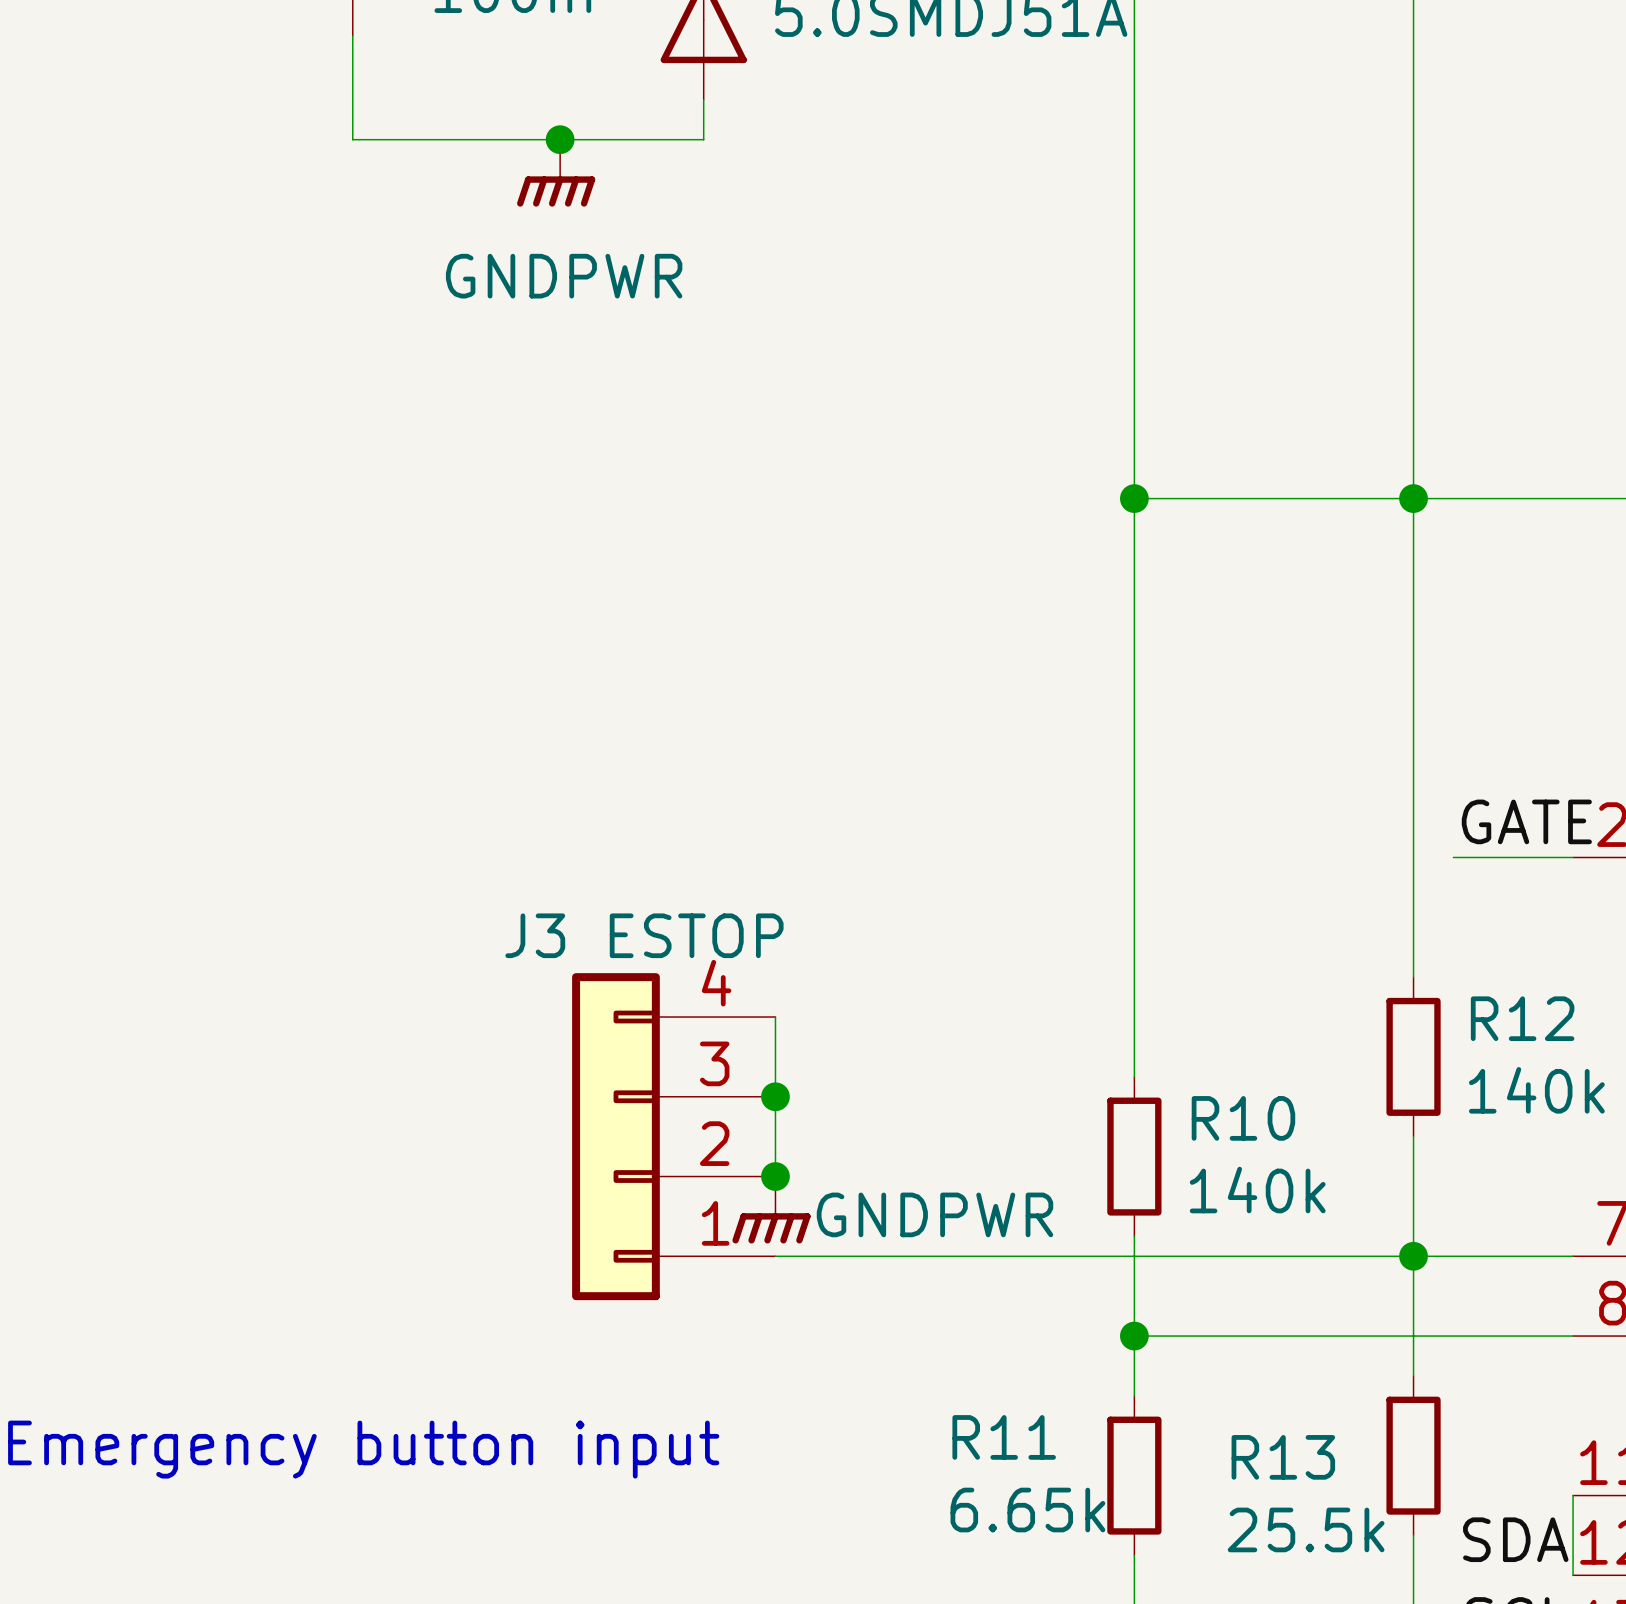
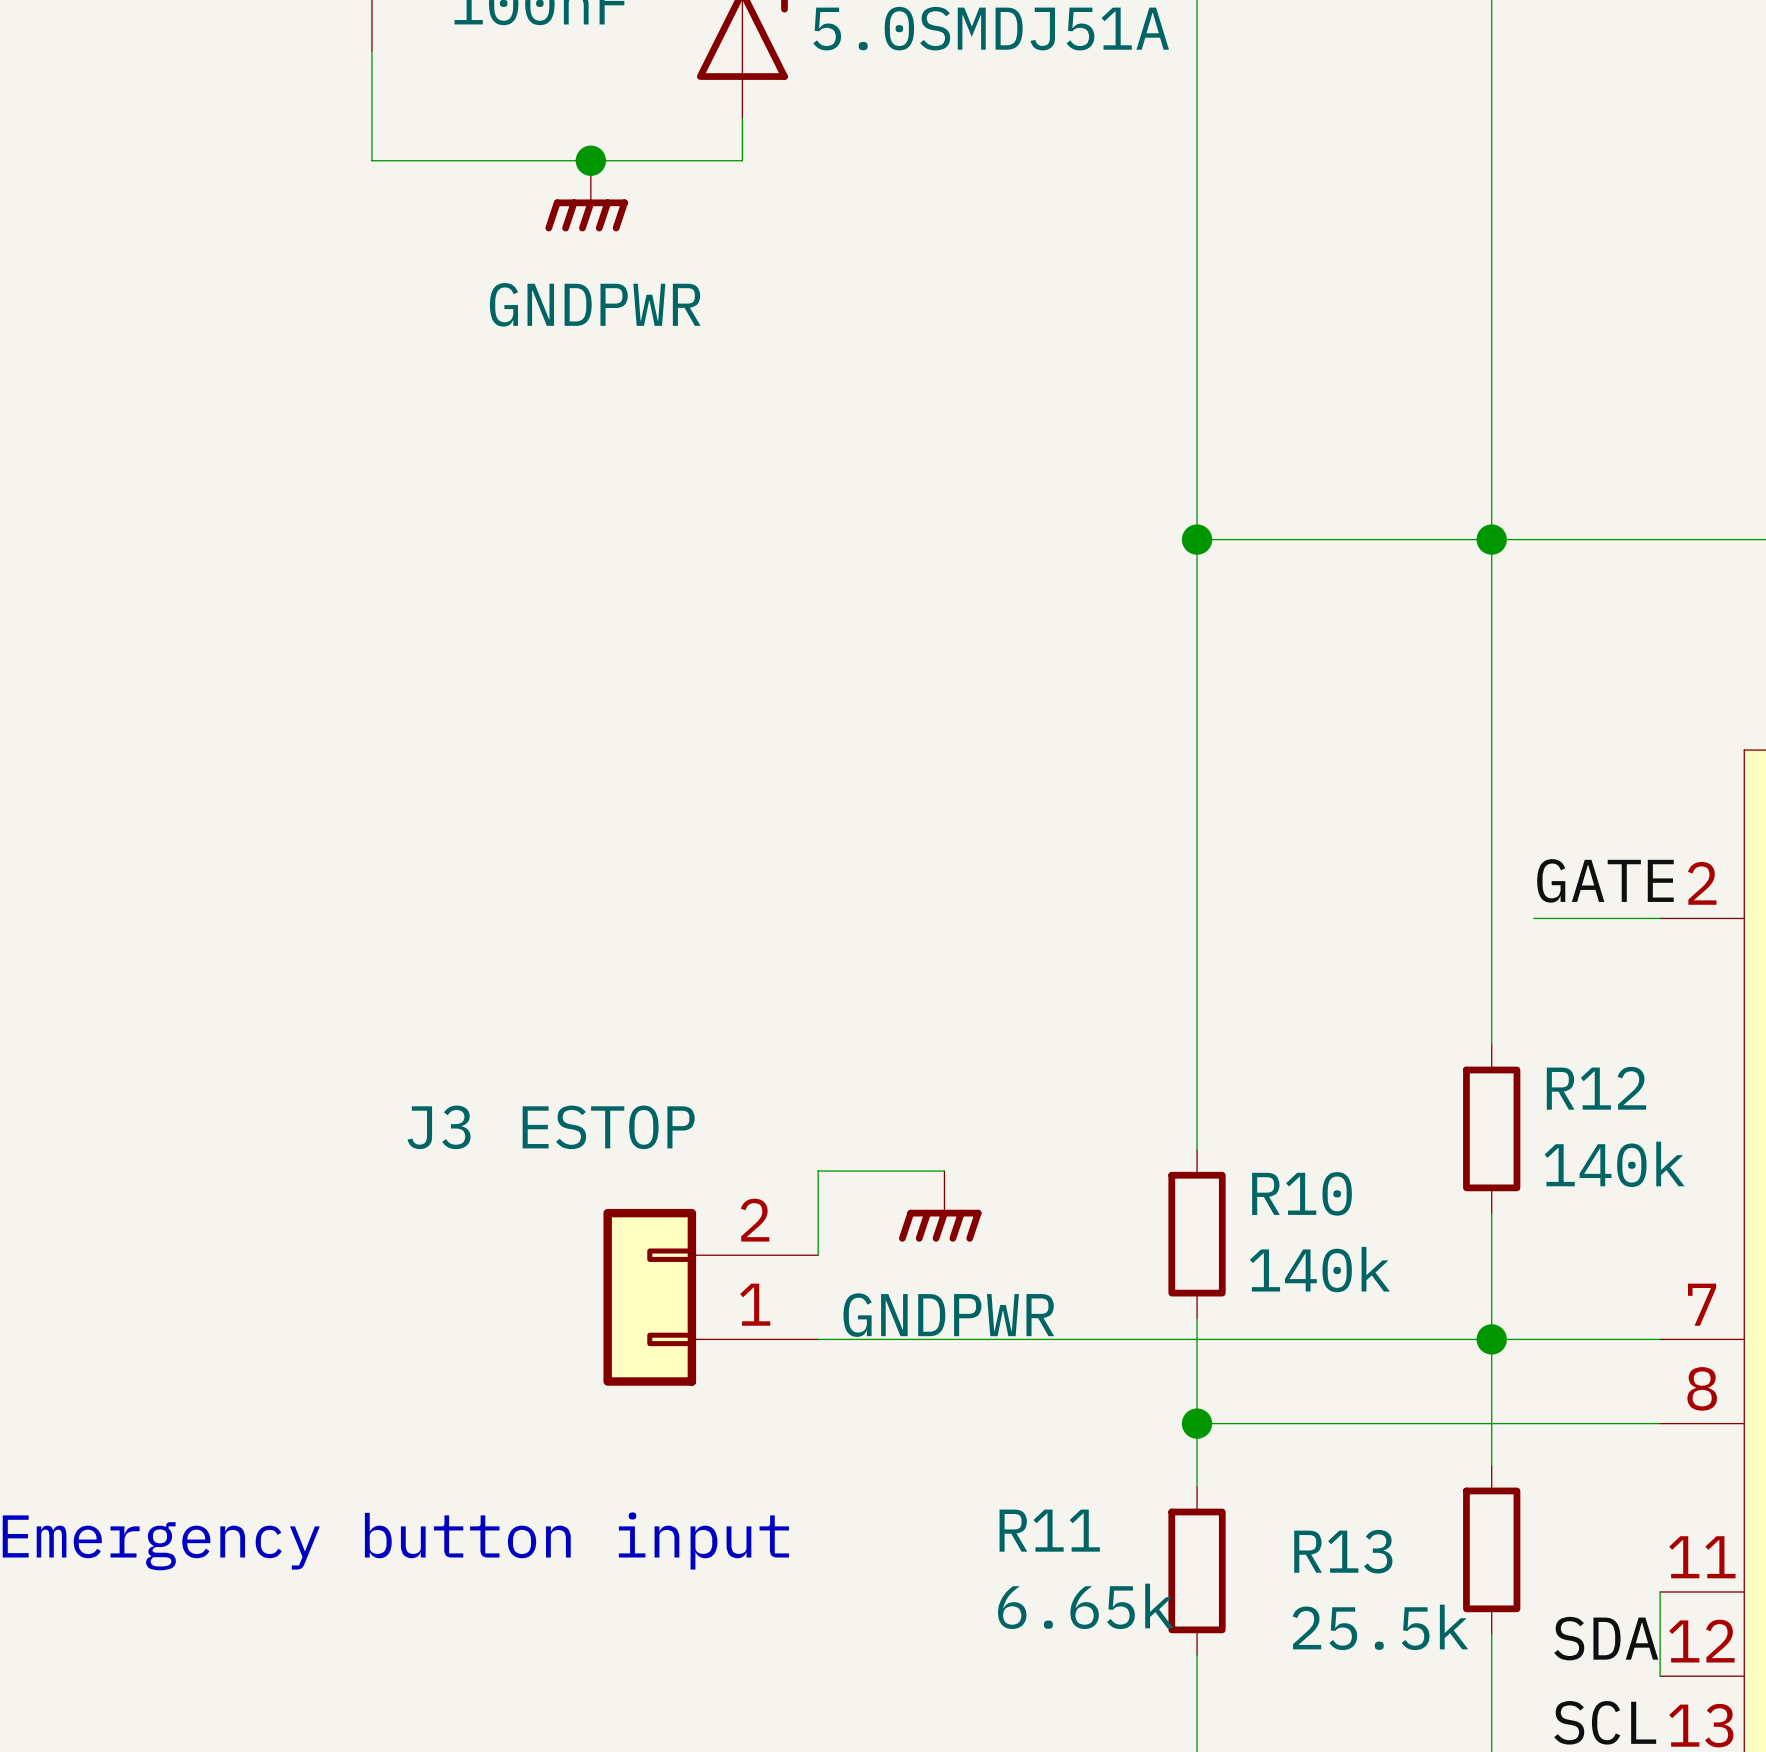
J3 name position: J3 (535, 935) -> J3 (439, 1127)
J3 value position: ESTOP (696, 935) -> ESTOP (608, 1127)
J3 symbol: [572, 973, 776, 1301] -> [603, 1208, 819, 1386]
wire: (775, 1017) (775, 1096) -> (944, 1171) (818, 1171)
junction: (775, 1096) -> none
junction: (775, 1176) -> none
power symbol position: GNDPWR (771, 1210) -> GNDPWR (940, 1206)
power symbol text position: GNDPWR (934, 1214) -> GNDPWR (948, 1315)

